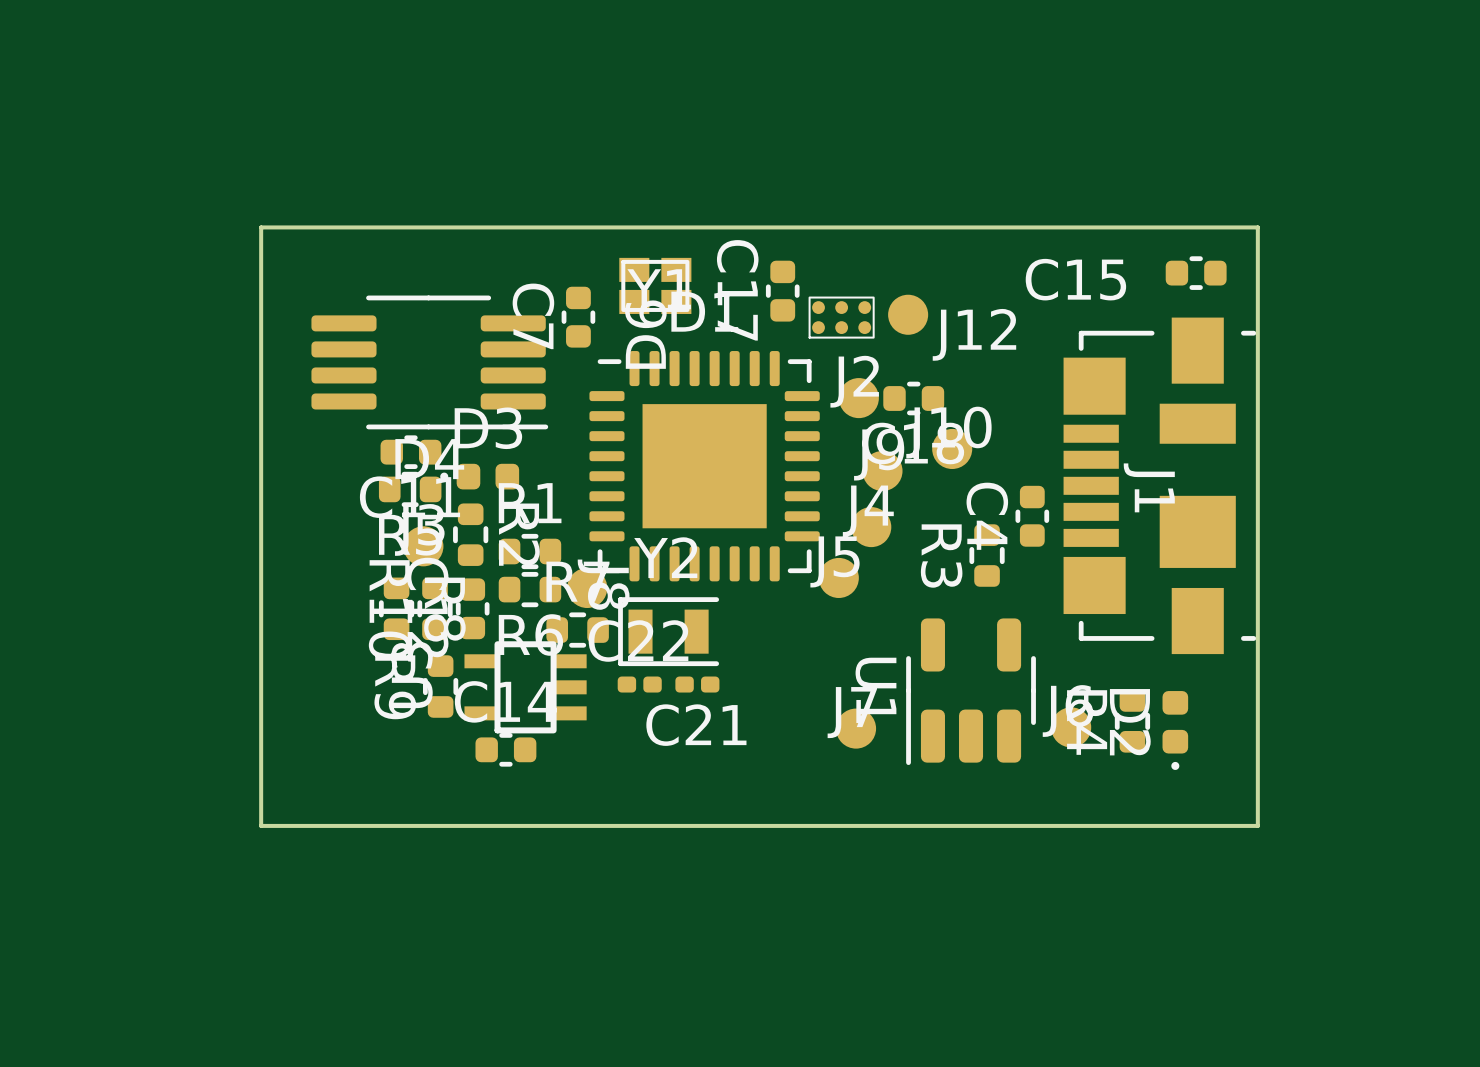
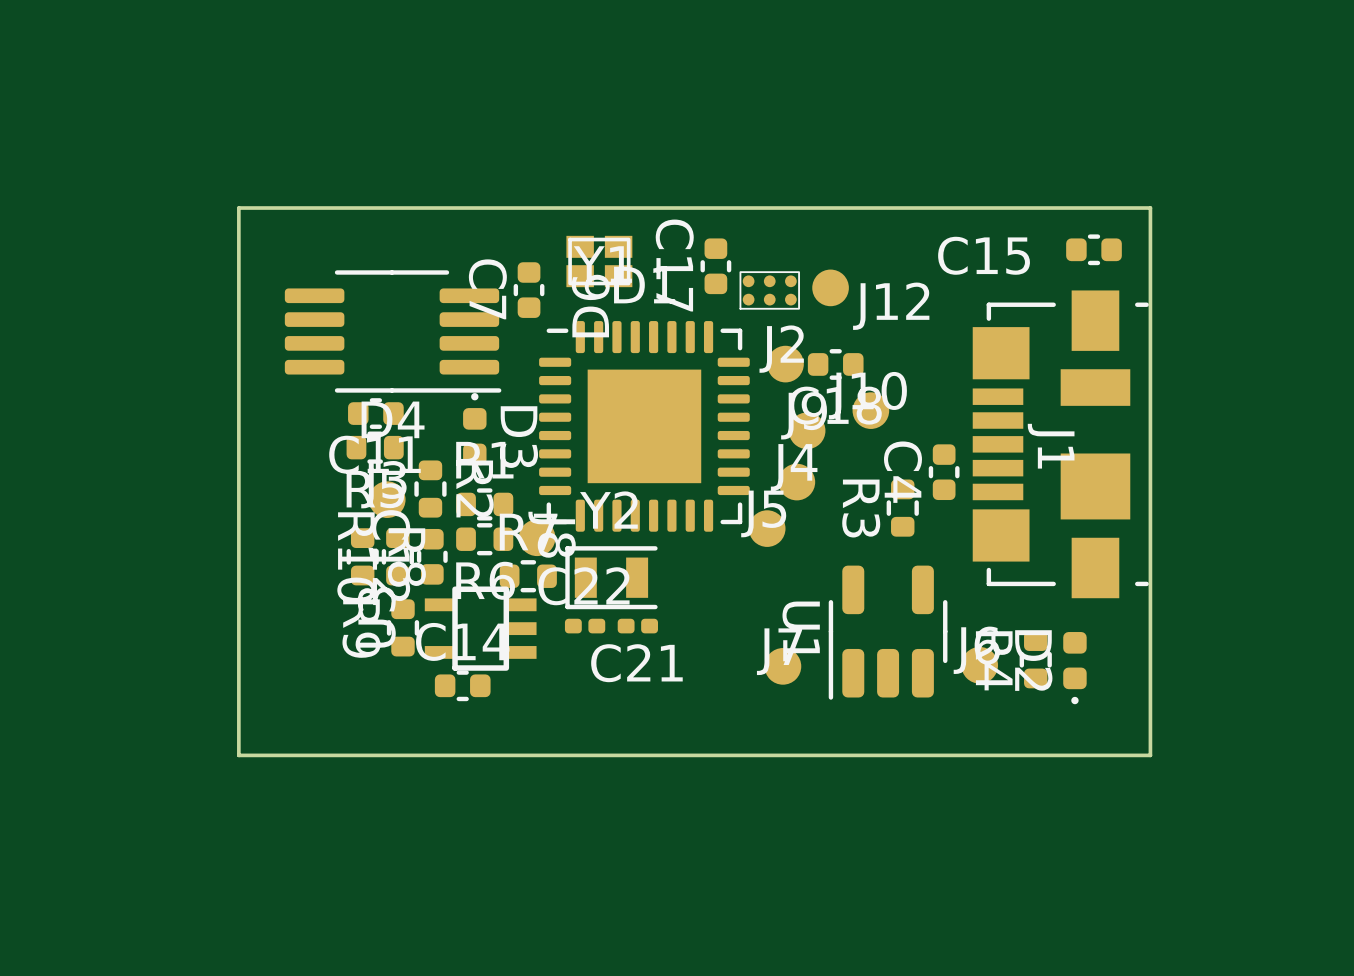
D3 rotation: 0° (479, 476) -> 90° clockwise (474, 429)

